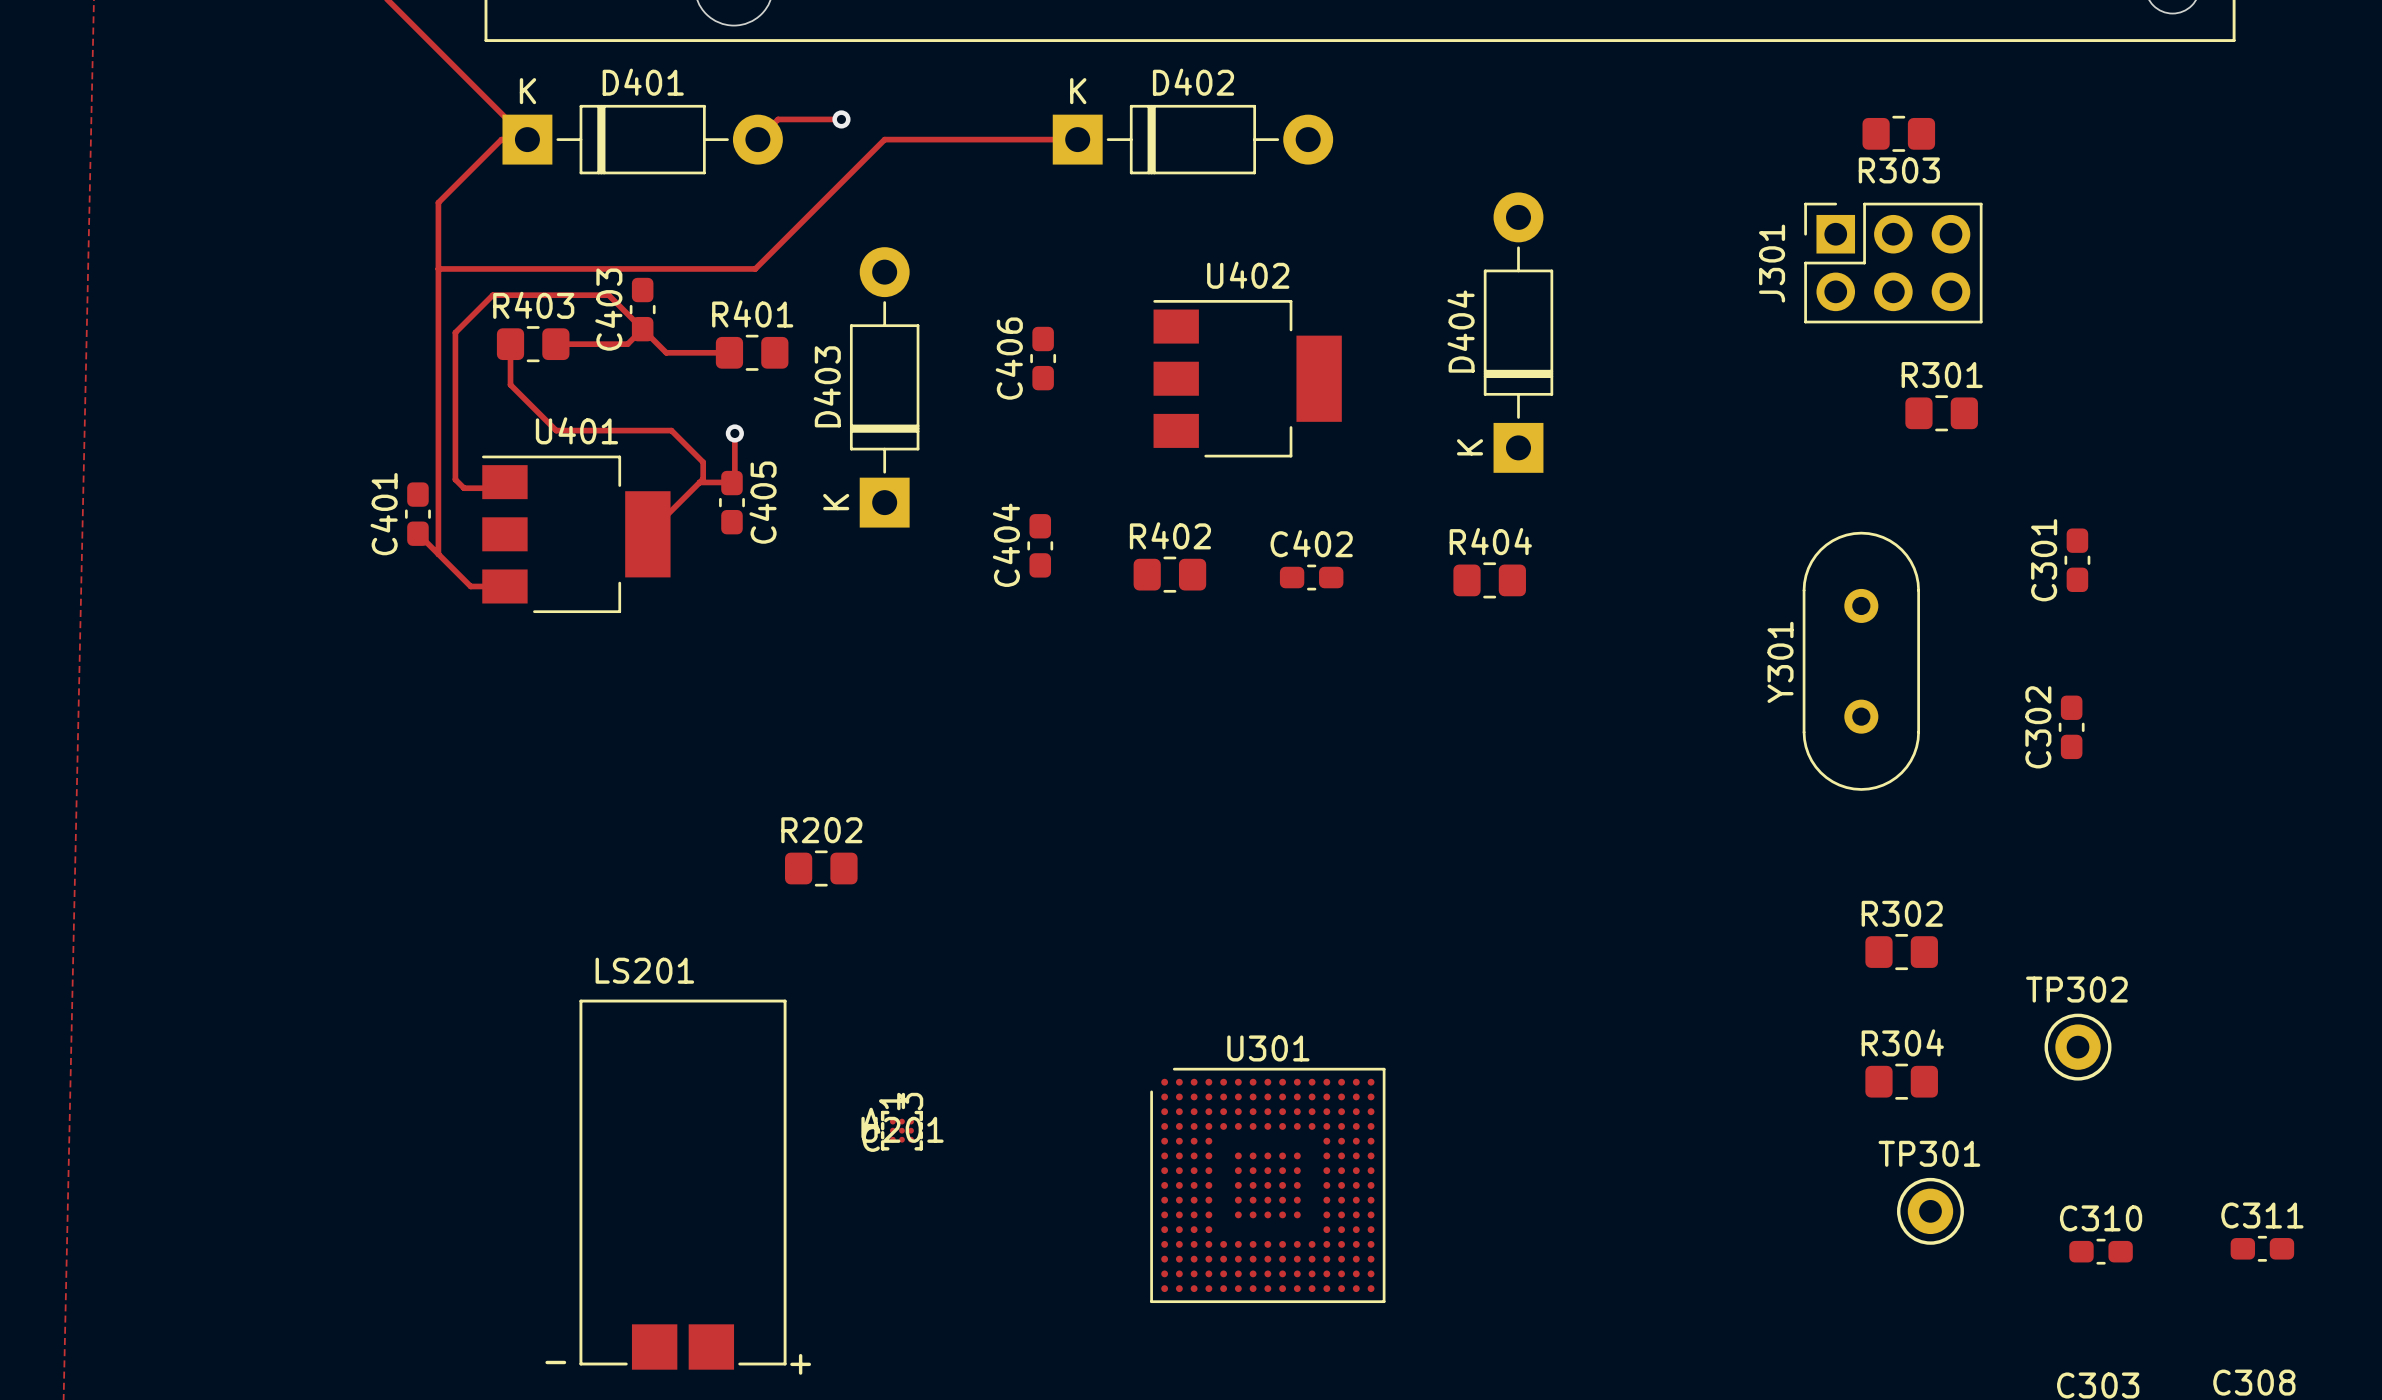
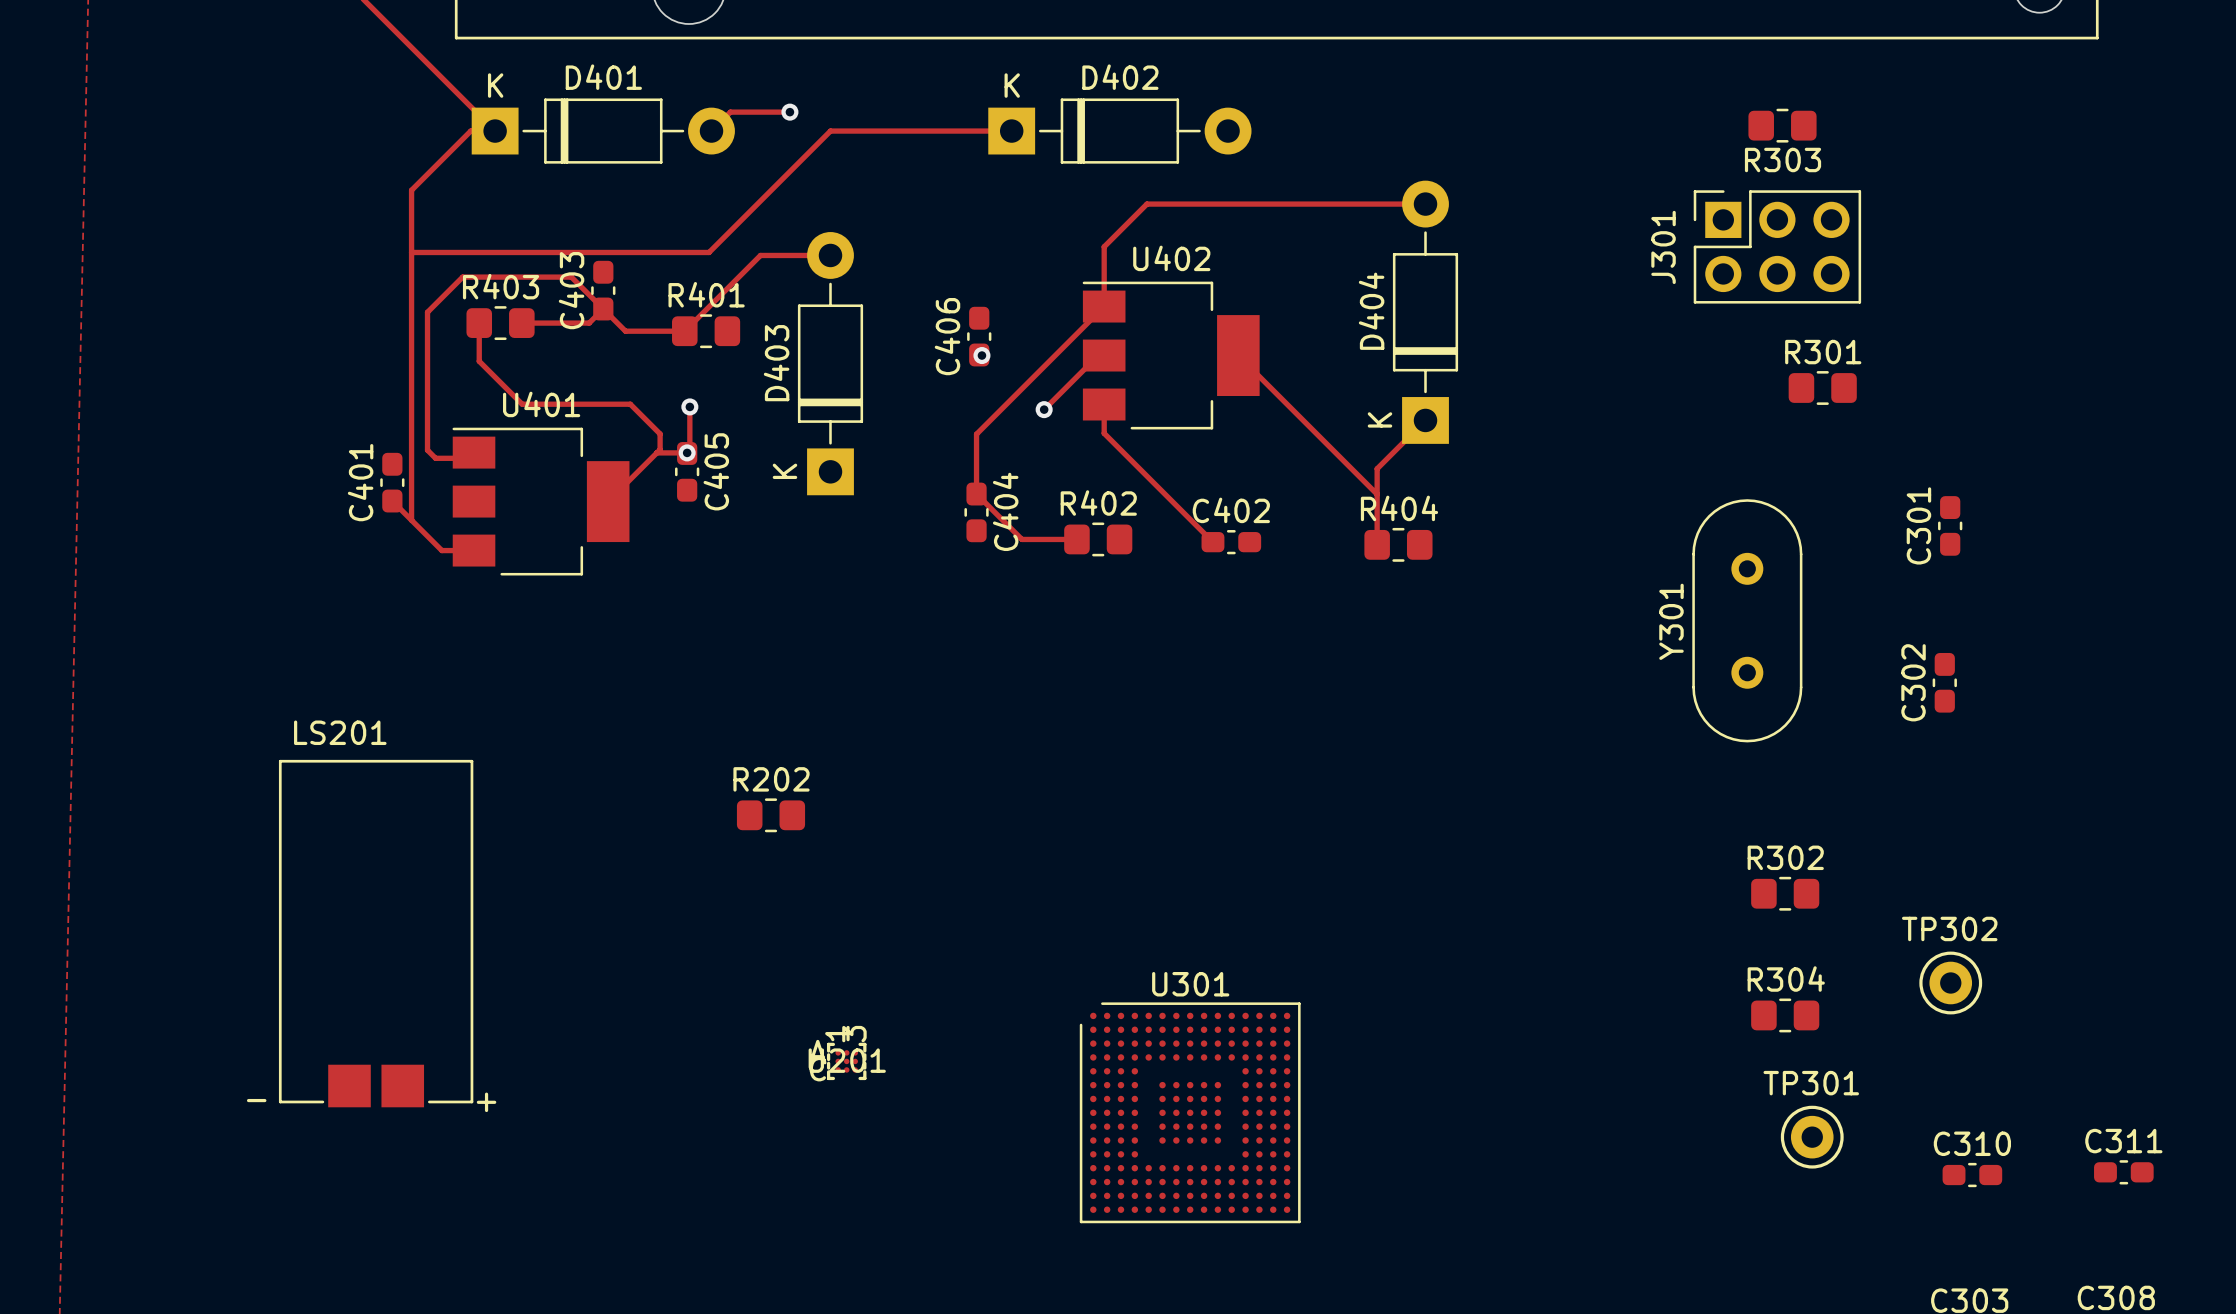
track: none -> (1425, 204) (1146, 204) (1104, 246) (1104, 306) (976, 434) (976, 494) (1021, 539) (1076, 539)
track: none -> (830, 255) (760, 255) (684, 331)
via: none -> (981, 355)
track: none -> (1104, 355) (1098, 355) (1044, 409)
track: none -> (1238, 355) (1377, 494)
track: none -> (1104, 404) (1104, 433) (1212, 542)
via: none -> (1044, 409)
track: none -> (1425, 420) (1377, 468) (1377, 544)
via: none -> (687, 452)
C404 name position: C404 (1006, 545) -> C404 (1005, 511)
LS201 position: (683, 1184) -> (376, 933)

